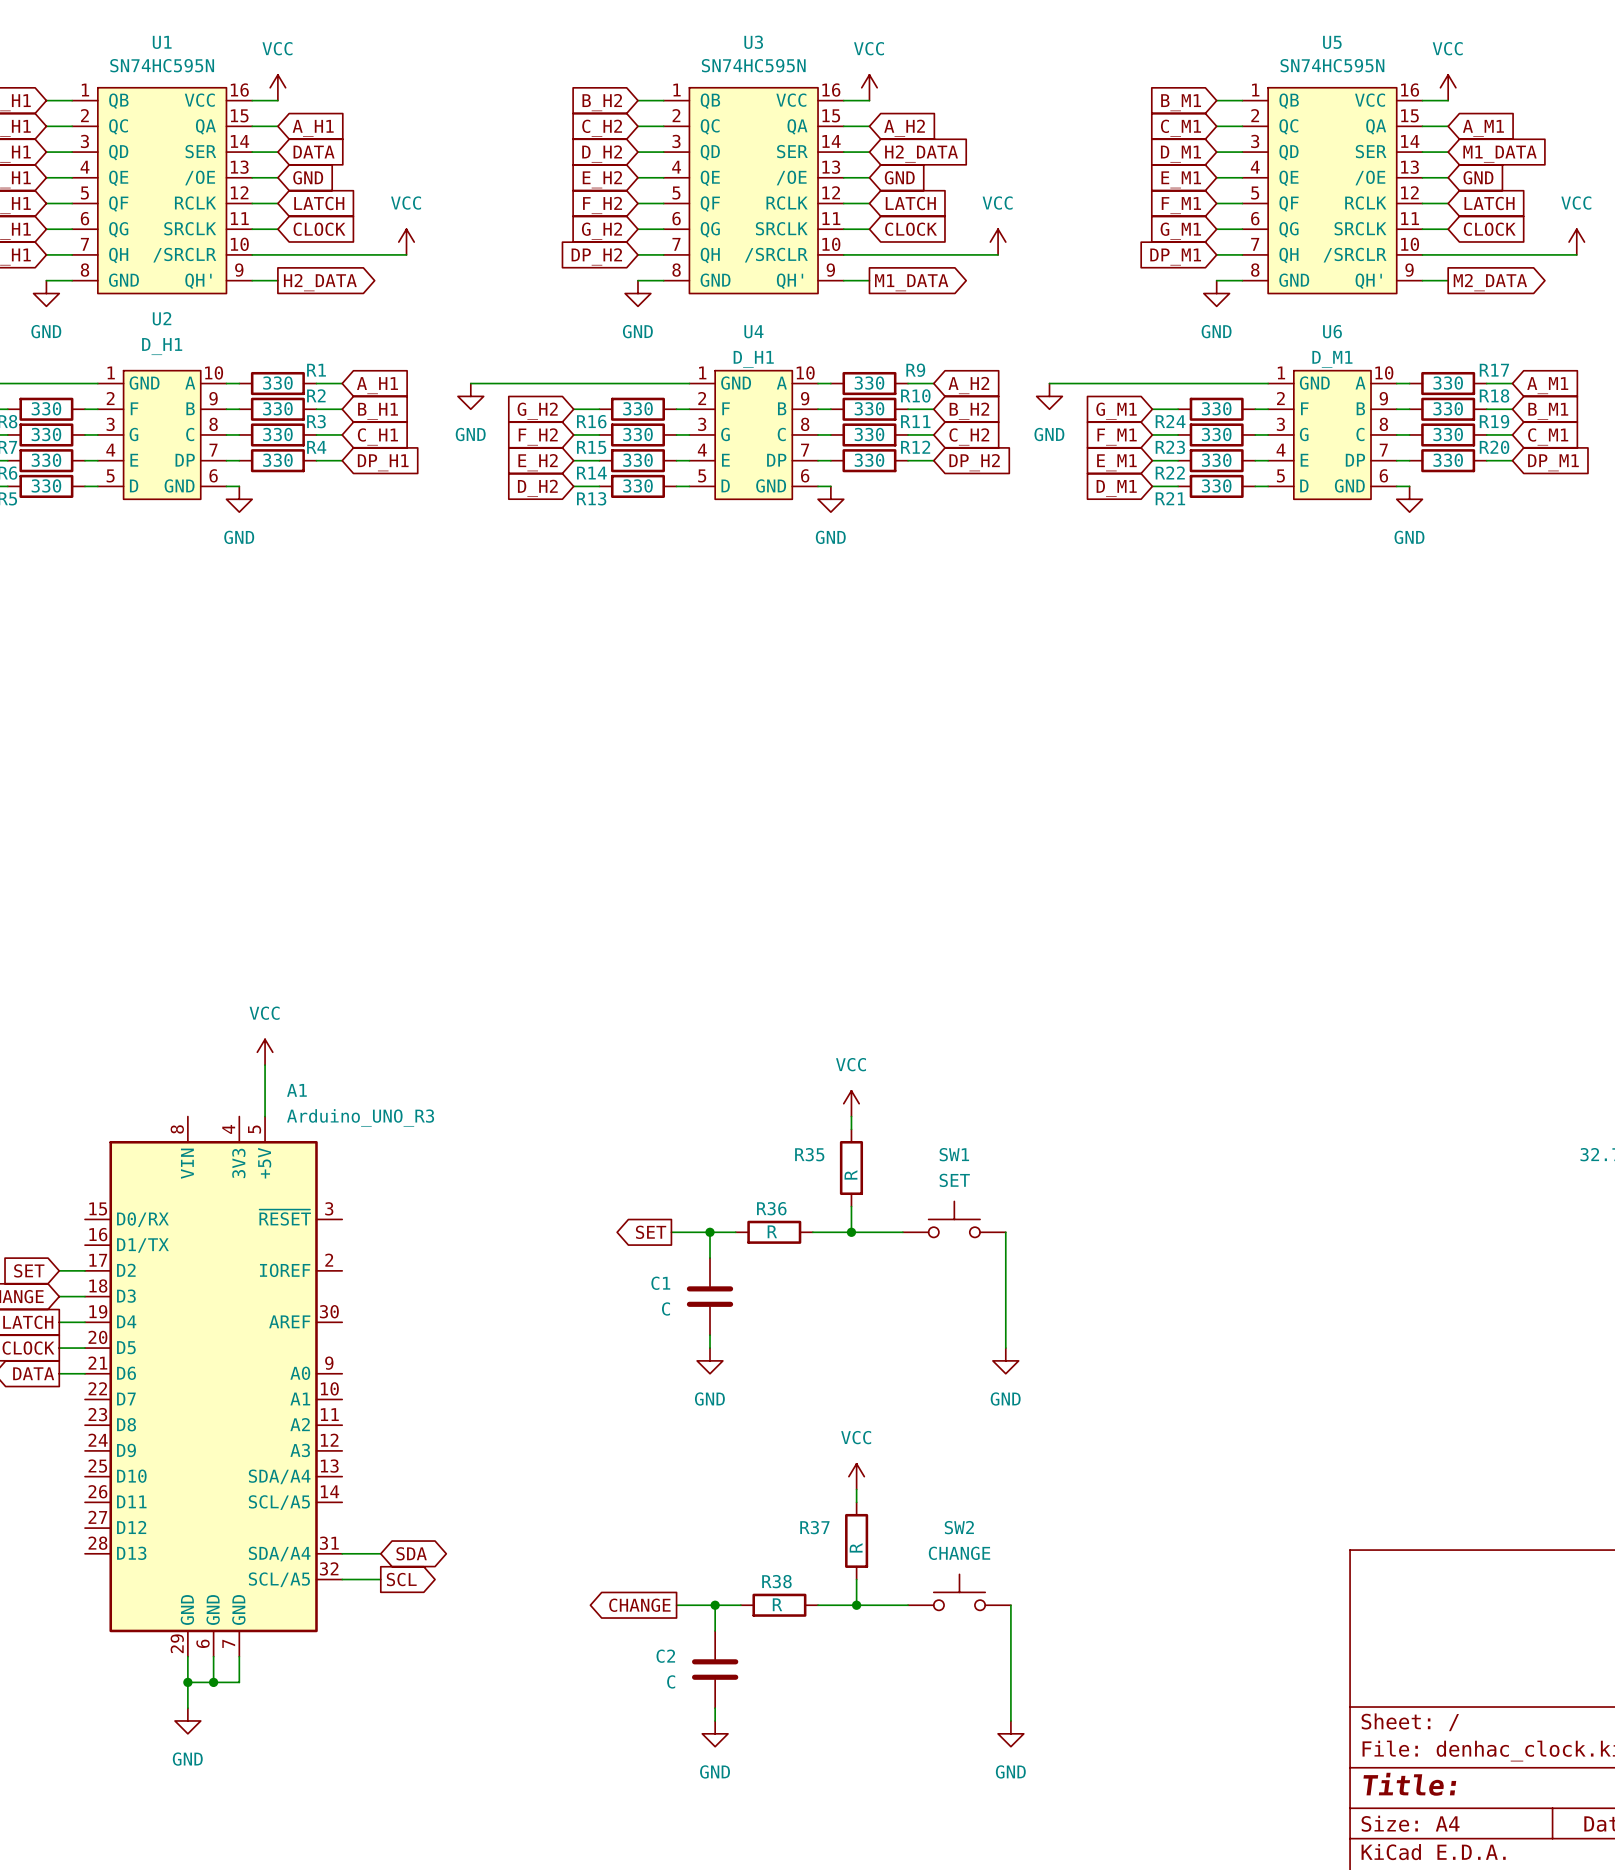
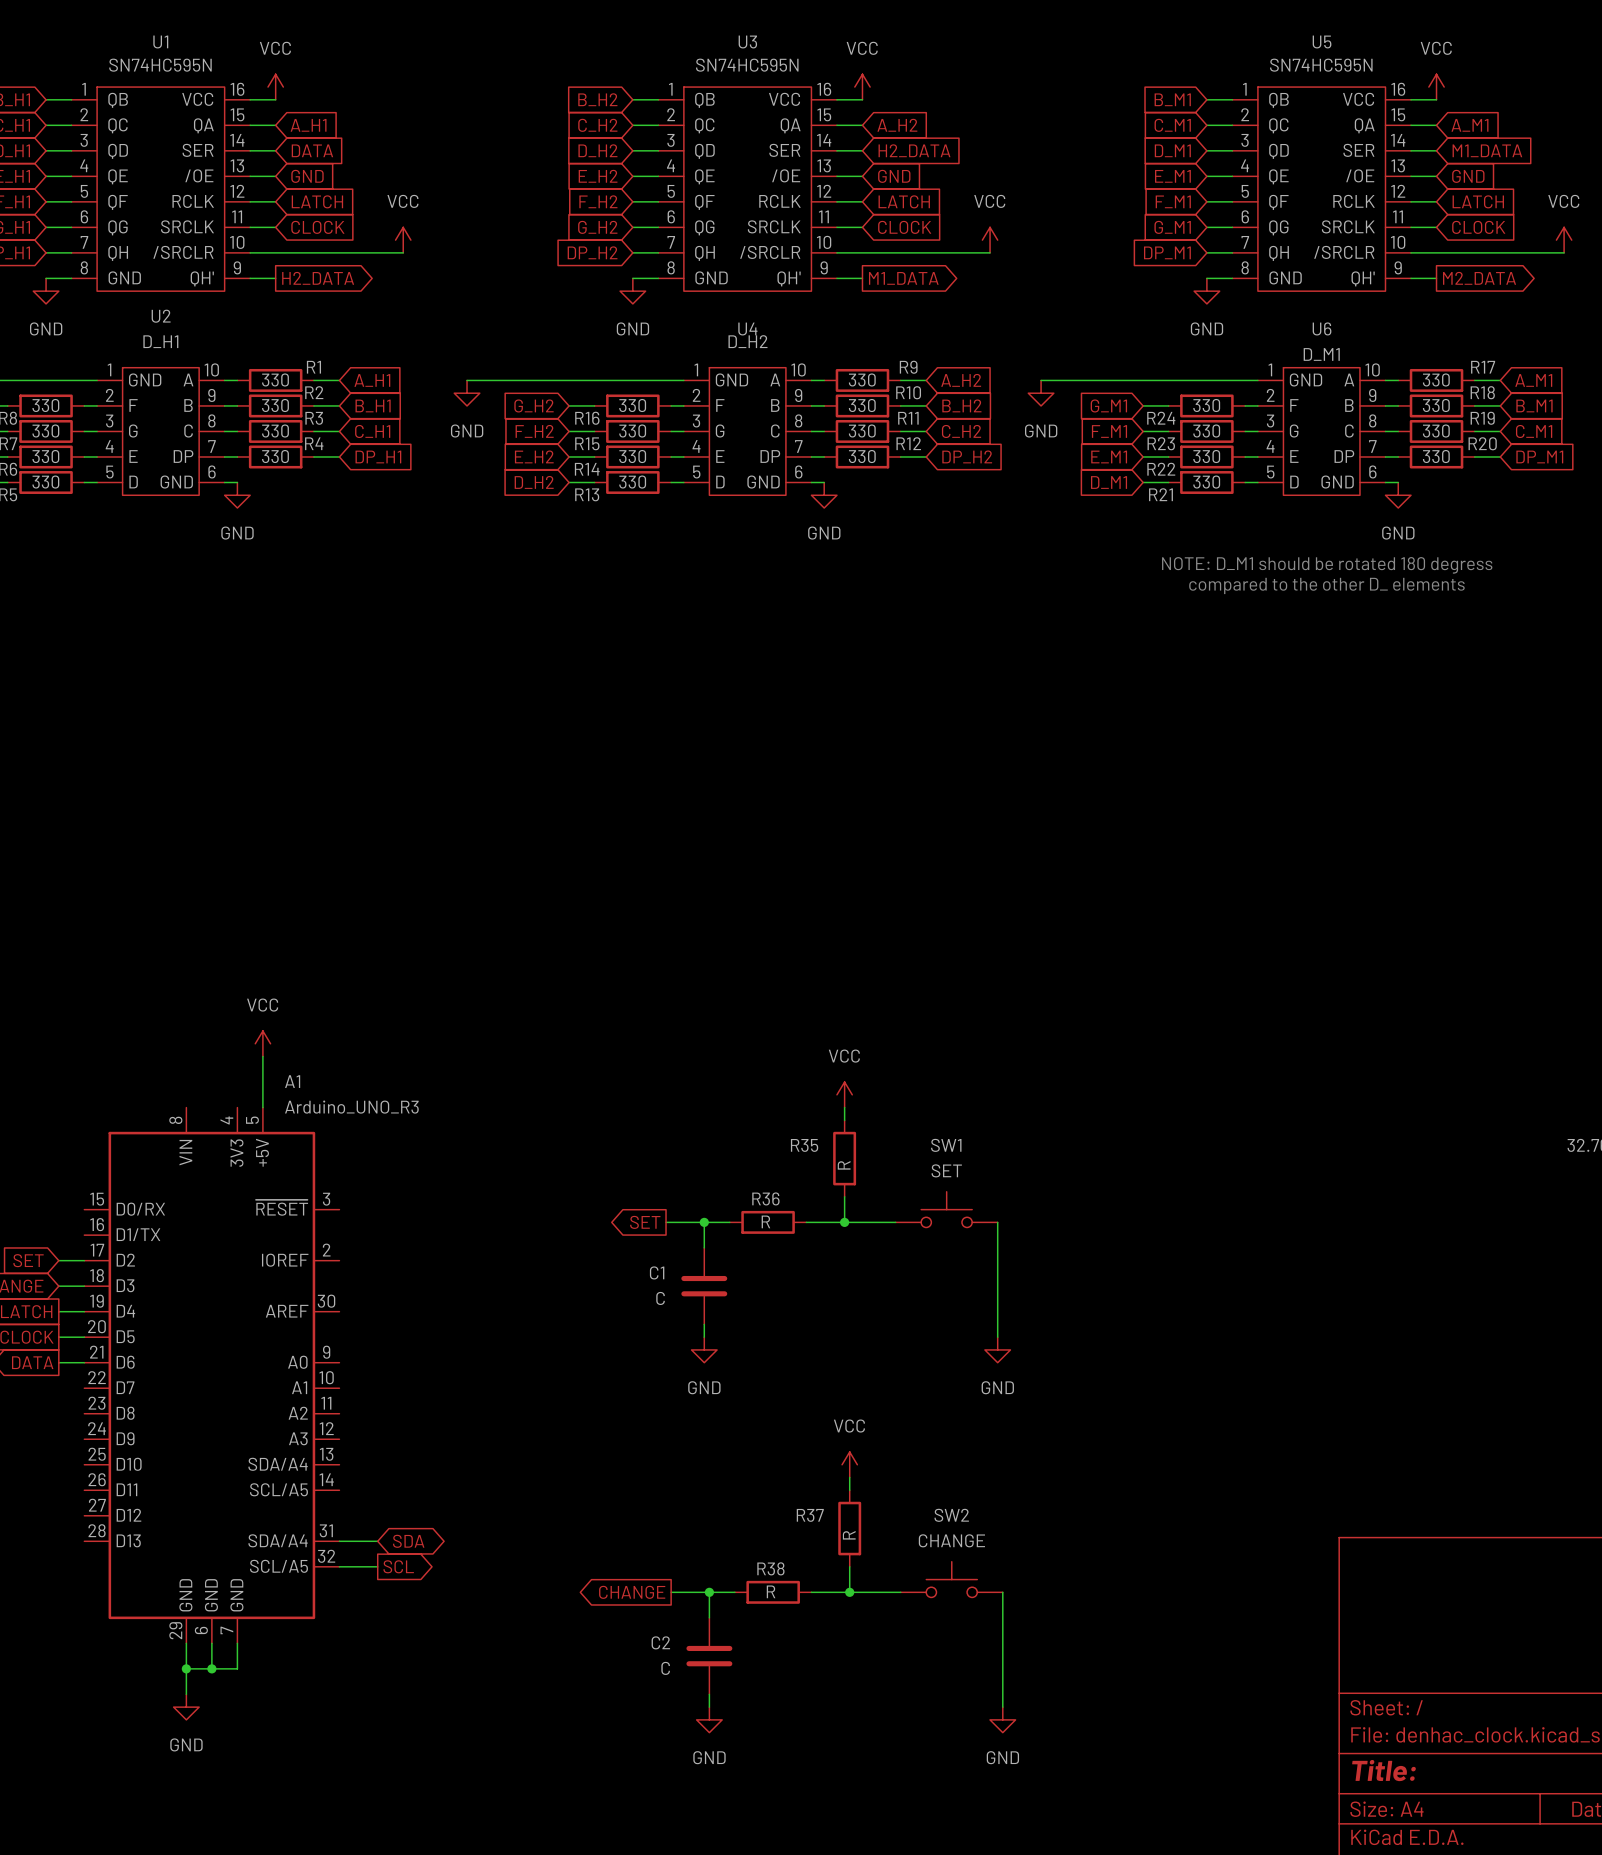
U4 value: D_H1 (753, 359) -> D_H2 (747, 341)
text: none -> NOTE: D_M1 should be rotated 180 degress (1327, 565)
text: none -> compared to the other D_ elements (1326, 585)

